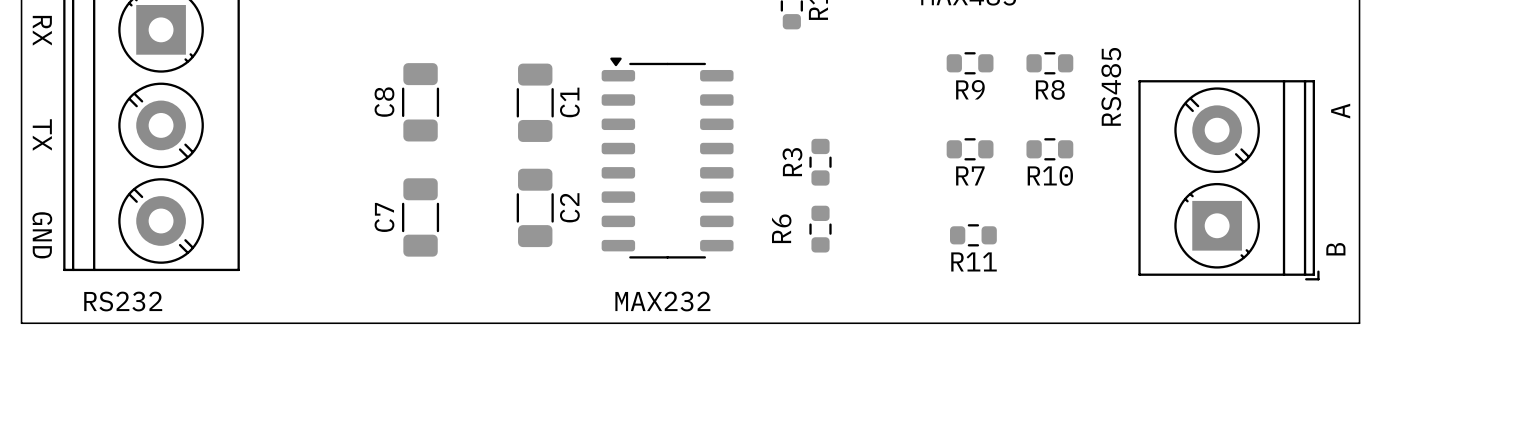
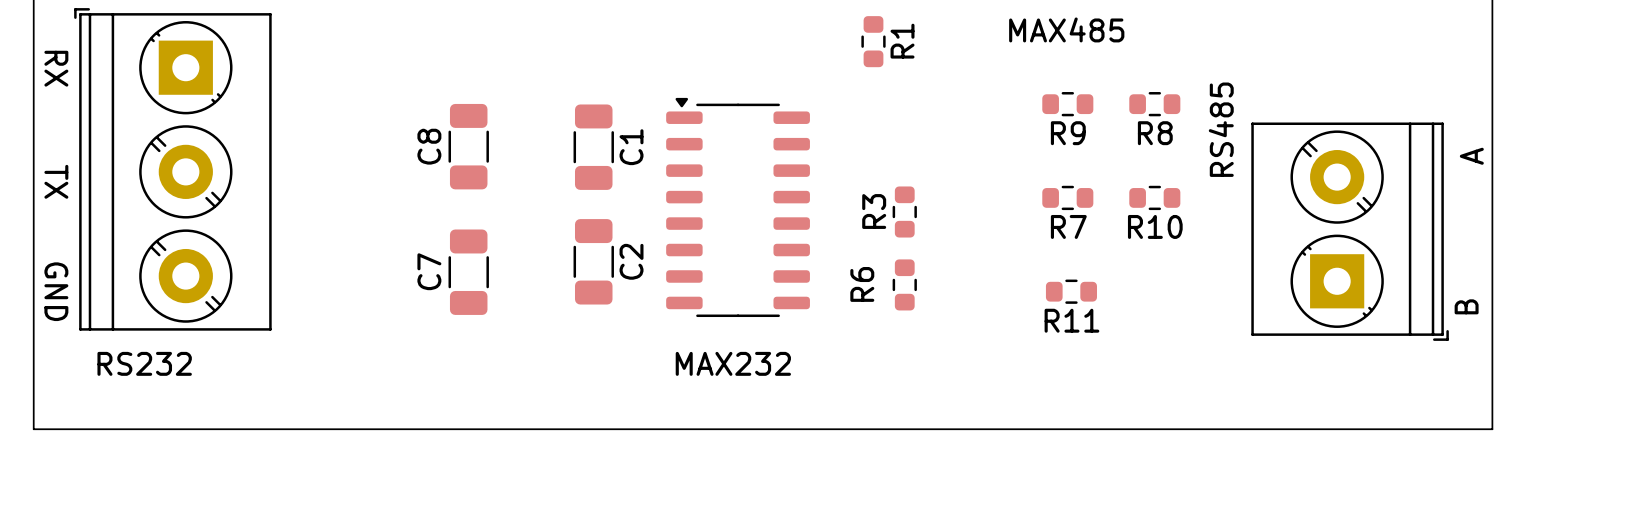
board edge: (21, 323) (1359, 323) -> (33, 387) (33, 429) (1492, 429) (1492, 387)

